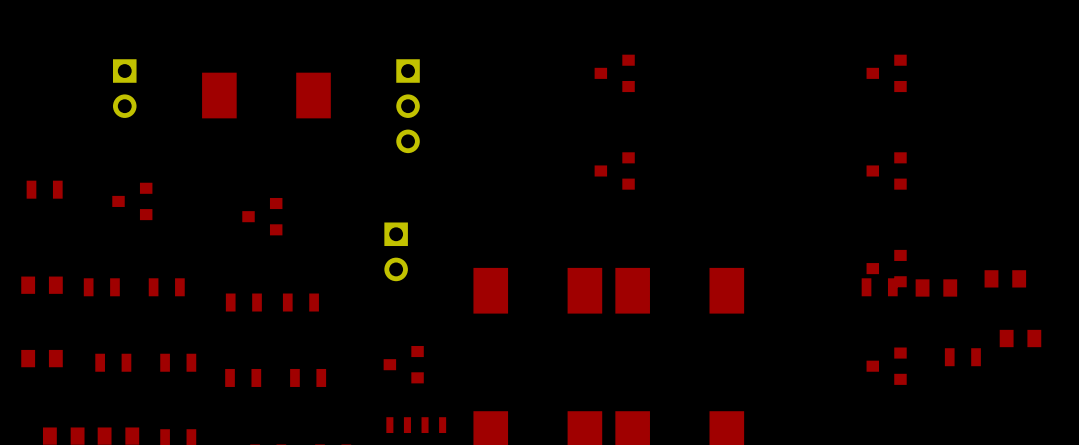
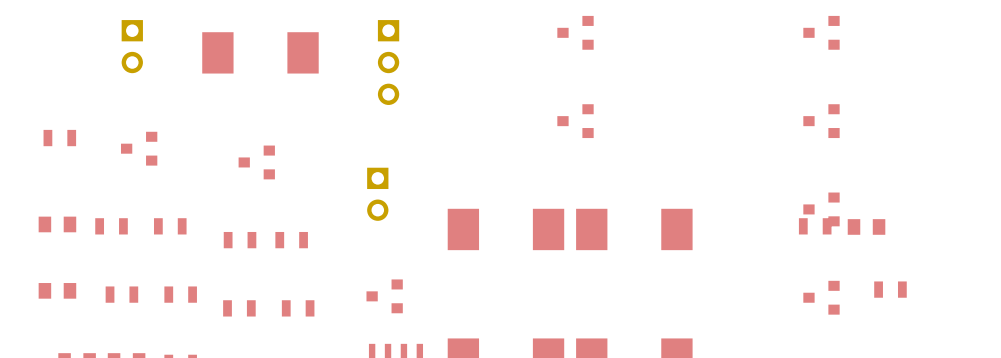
part: (1005, 278) -> none
part: (1020, 338) -> none

